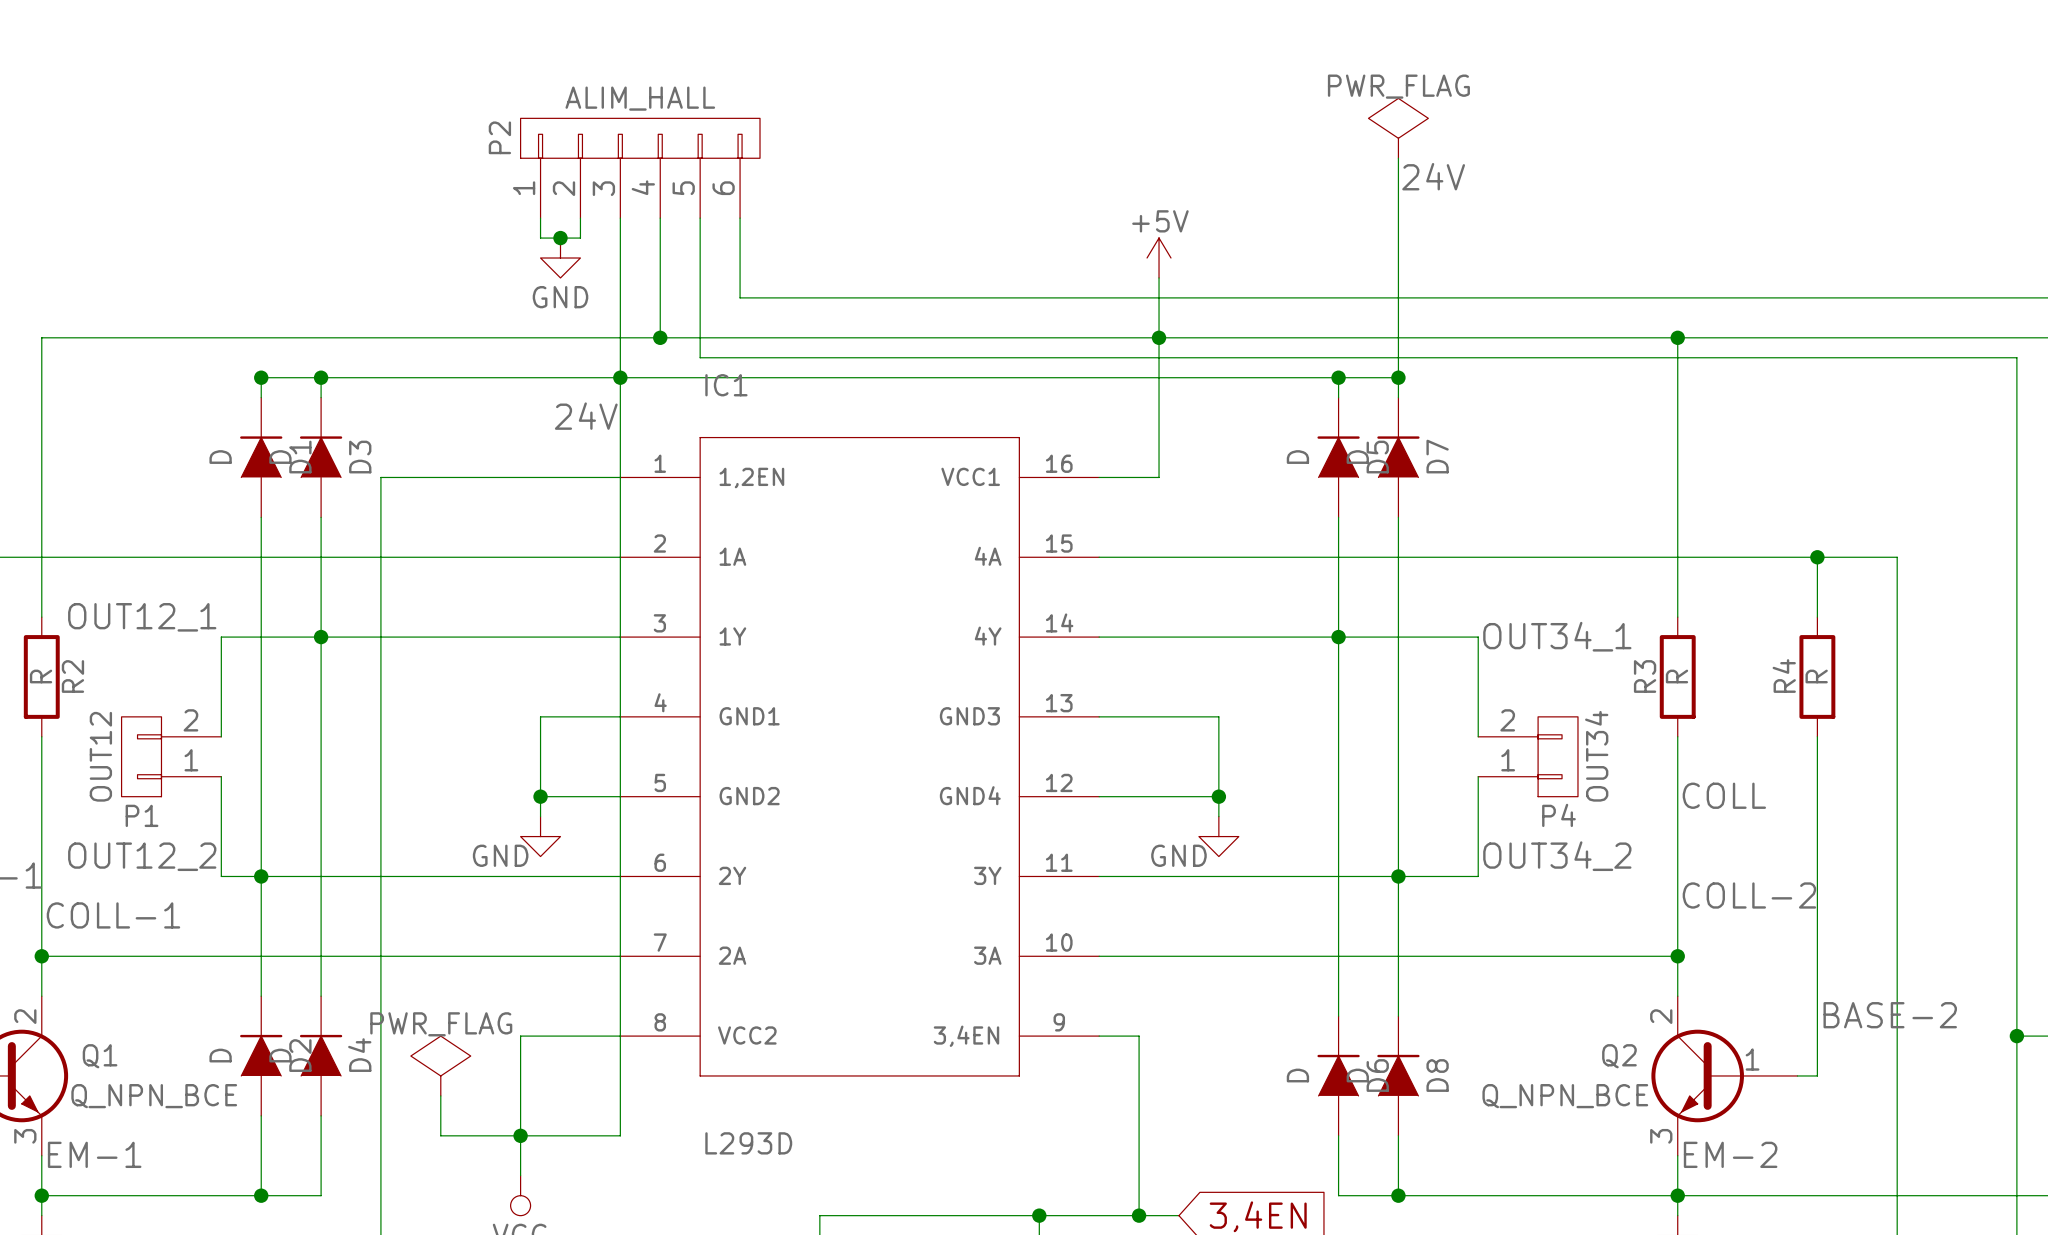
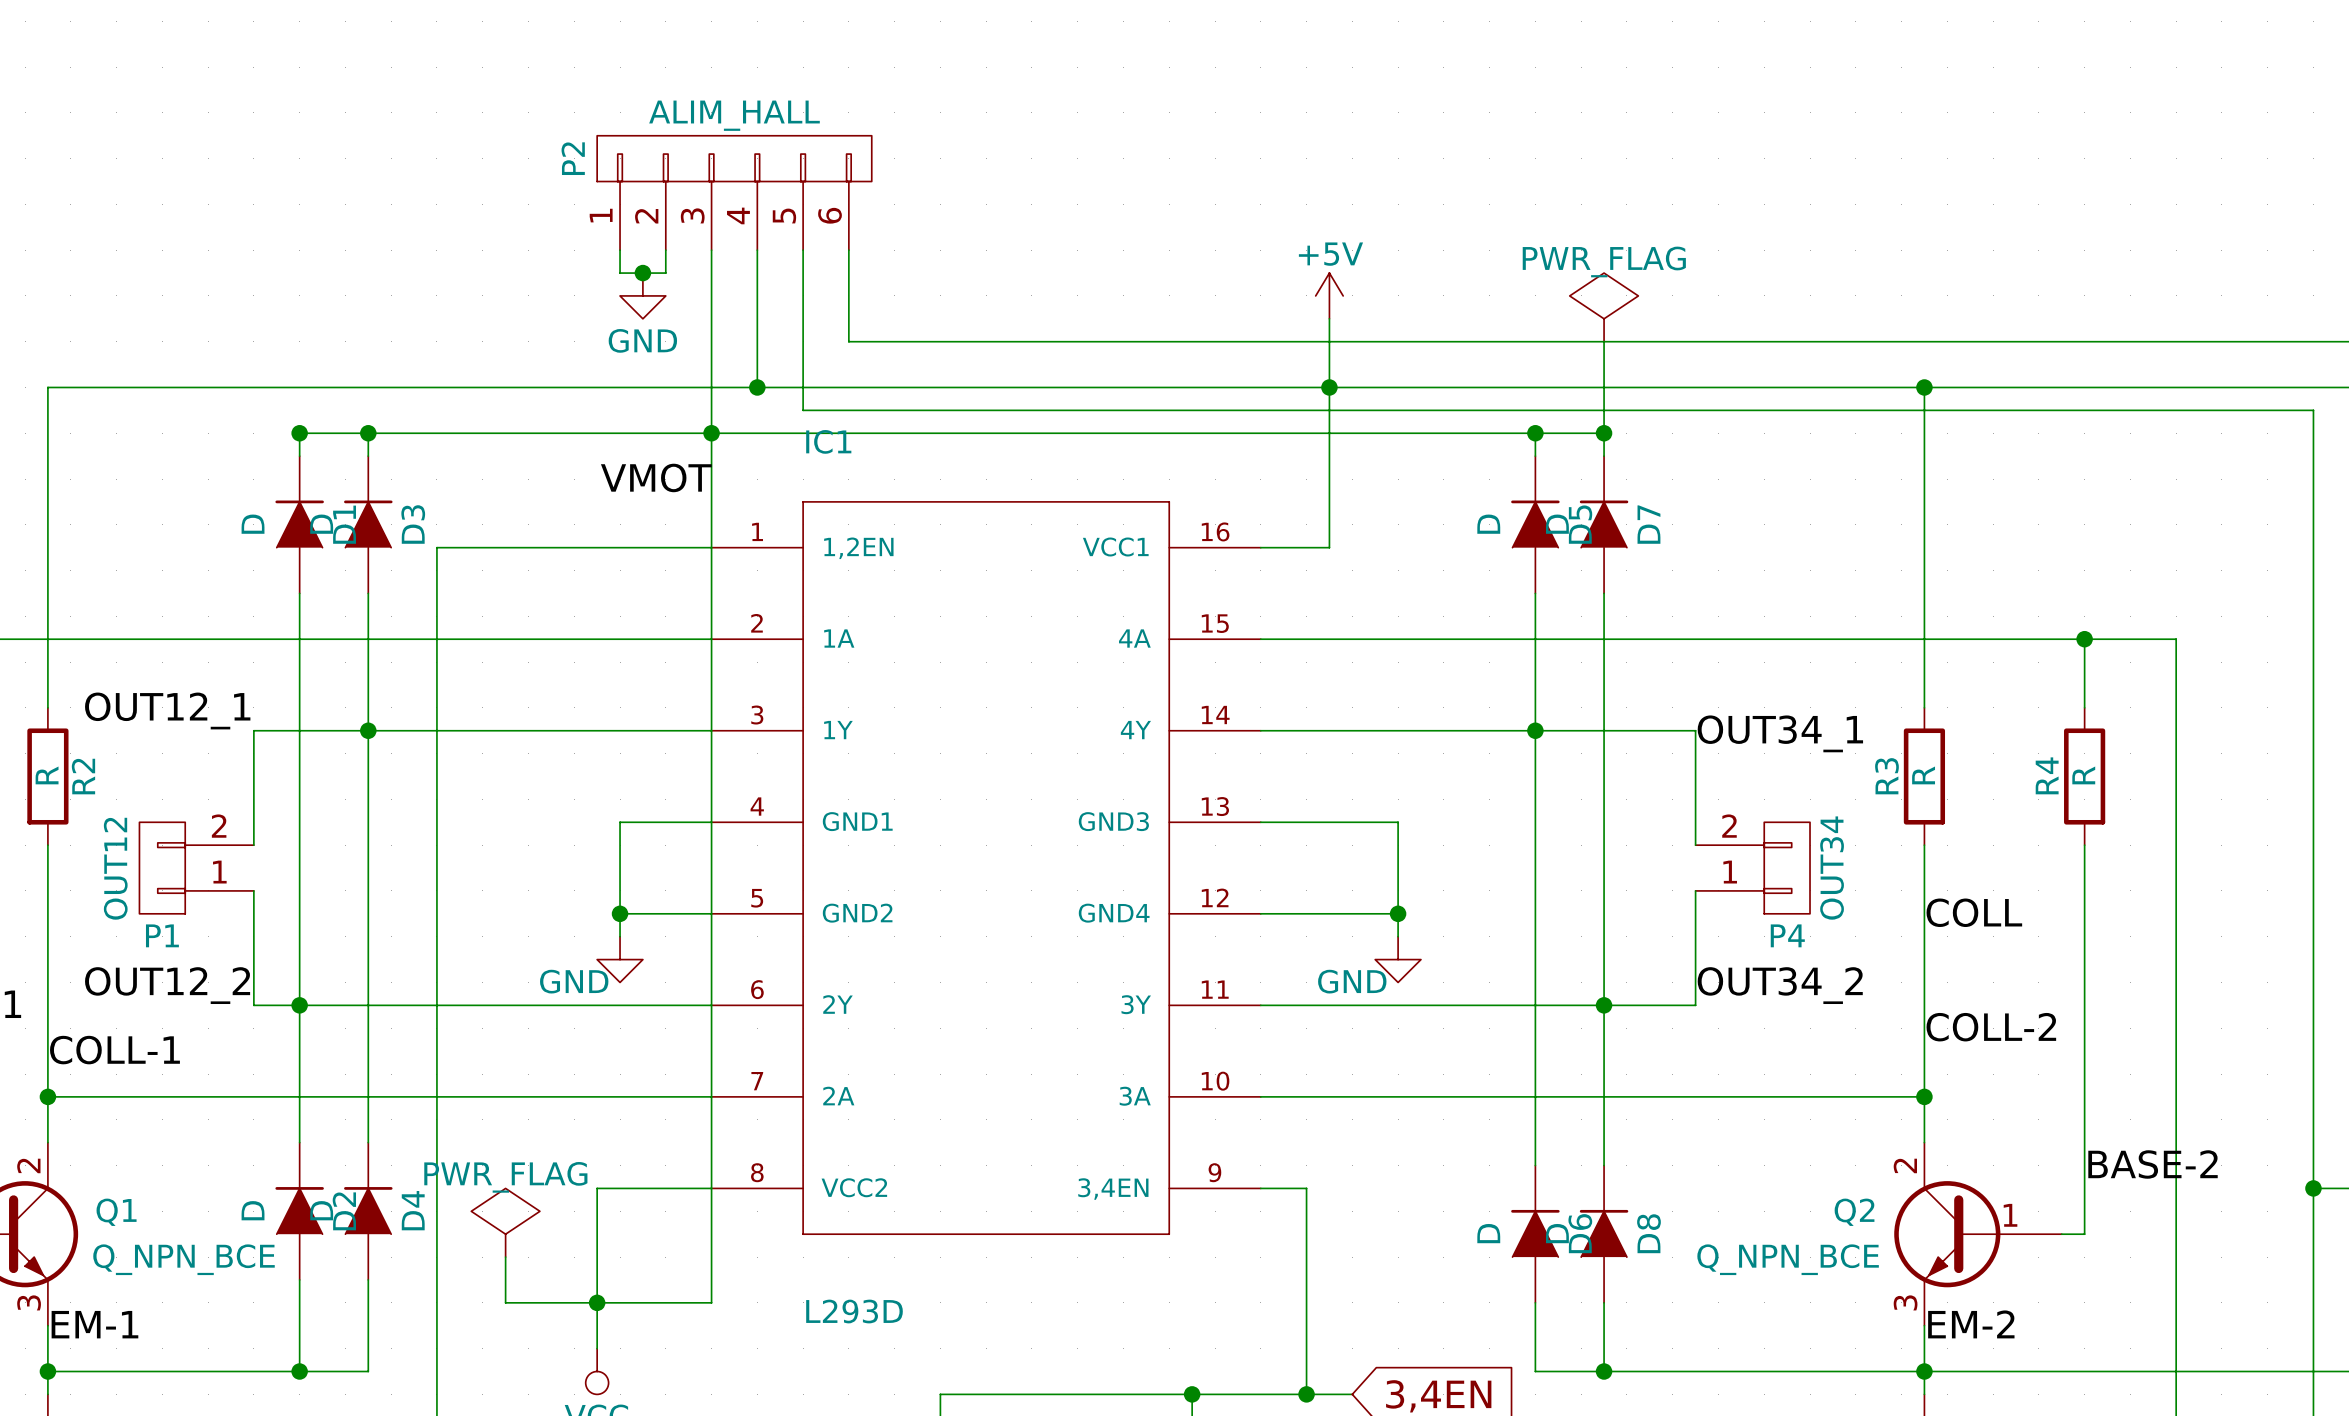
power symbol position: PWR_FLAG (1398, 128) -> PWR_FLAG (1604, 307)
wire: (1398, 158) (1398, 297) -> none
label: 24V (1433, 176) -> none
label: 24V (586, 416) -> VMOT (656, 477)

